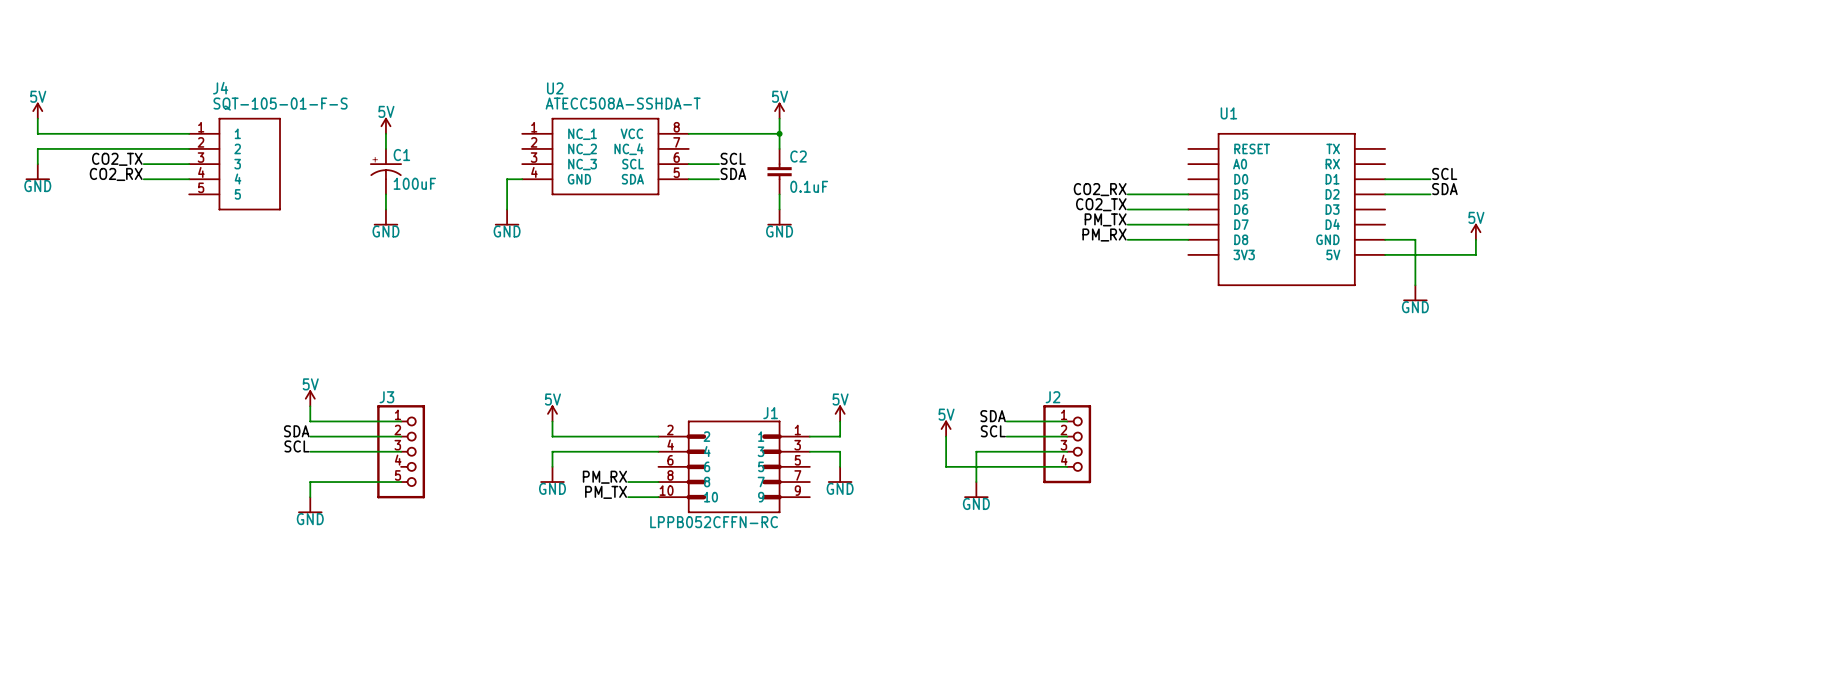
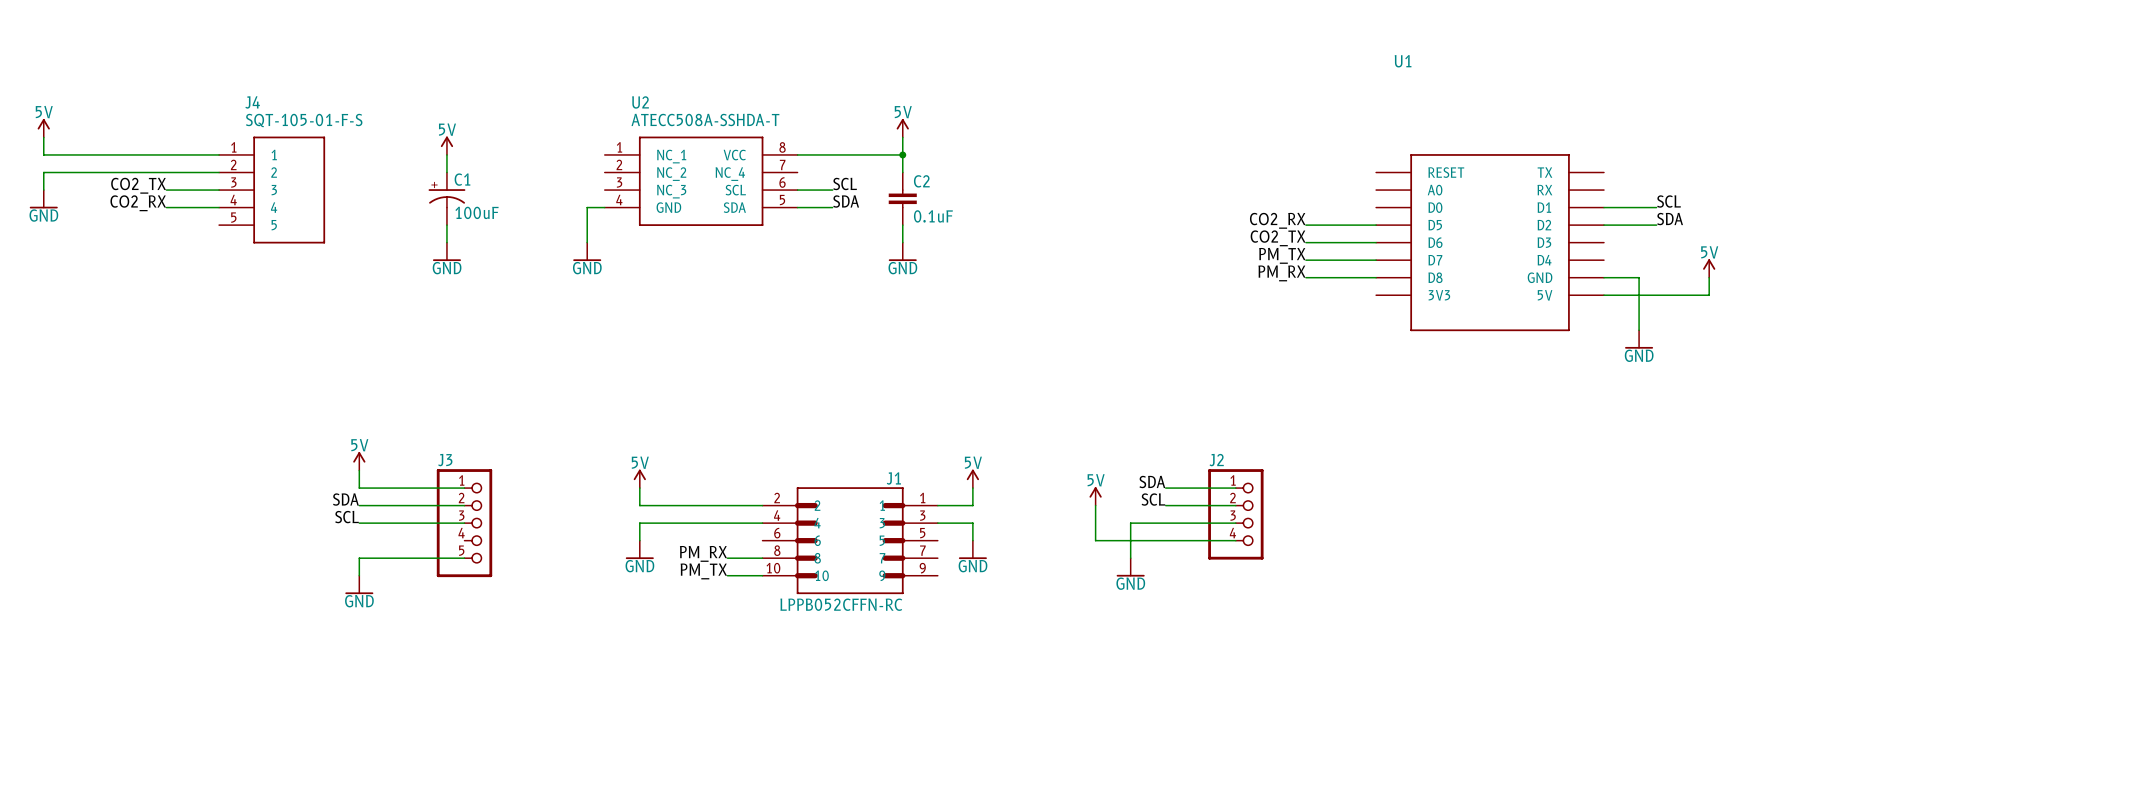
U1 name position: U1 (1228, 113) -> U1 (1403, 61)

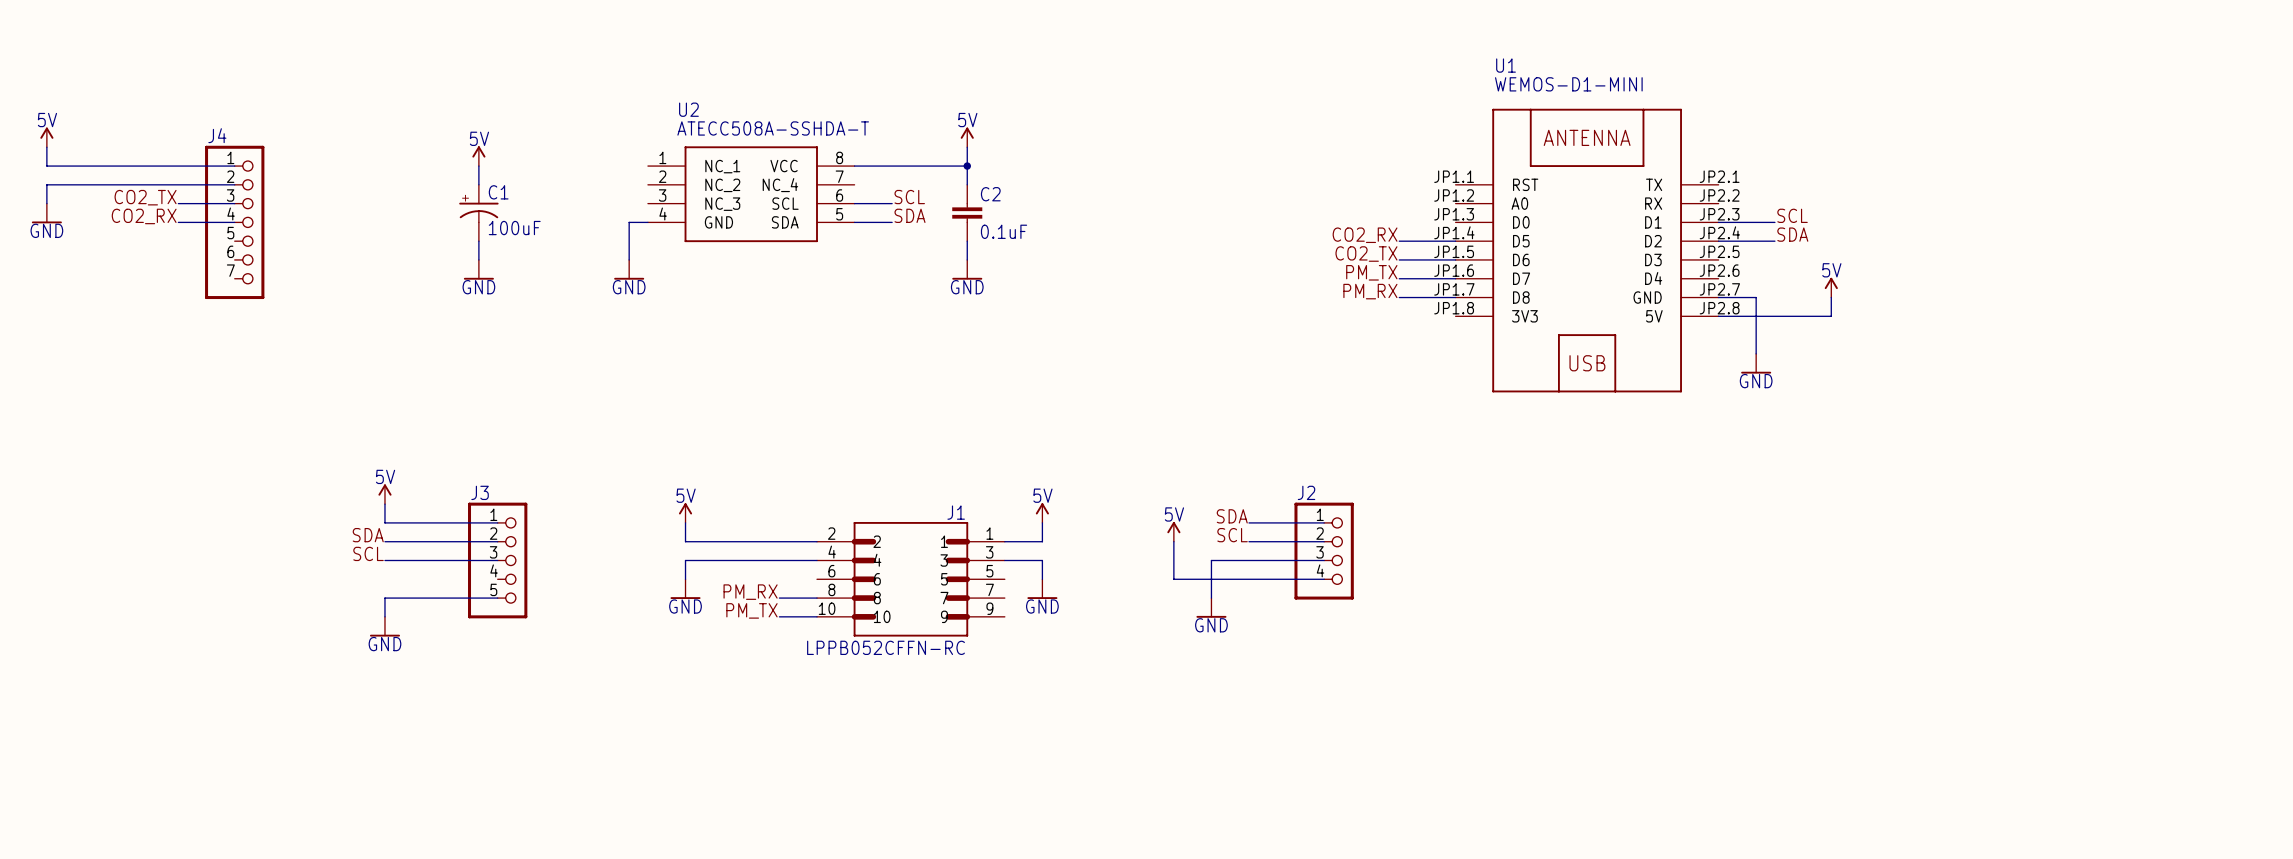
U1 value: none -> WEMOS-D1-MINI (1568, 84)
J4 value: SQT-105-01-F-S (304, 120) -> none
J4 symbol: [219, 136, 326, 244] -> [205, 145, 265, 300]
U1 symbol: [1376, 154, 1605, 332] -> [1455, 108, 1719, 393]

